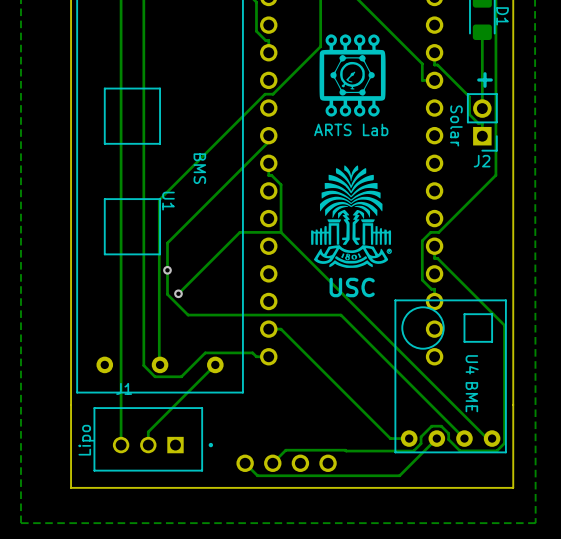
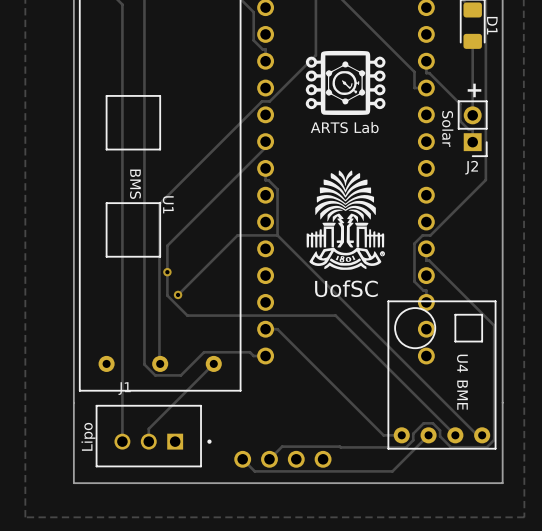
ARTS Lab rotation: 0° (352, 75) -> 90° counterclockwise (345, 82)
text position: BMS (199, 168) -> BMS (135, 184)
USC name: USC (352, 287) -> UofSC (346, 288)

